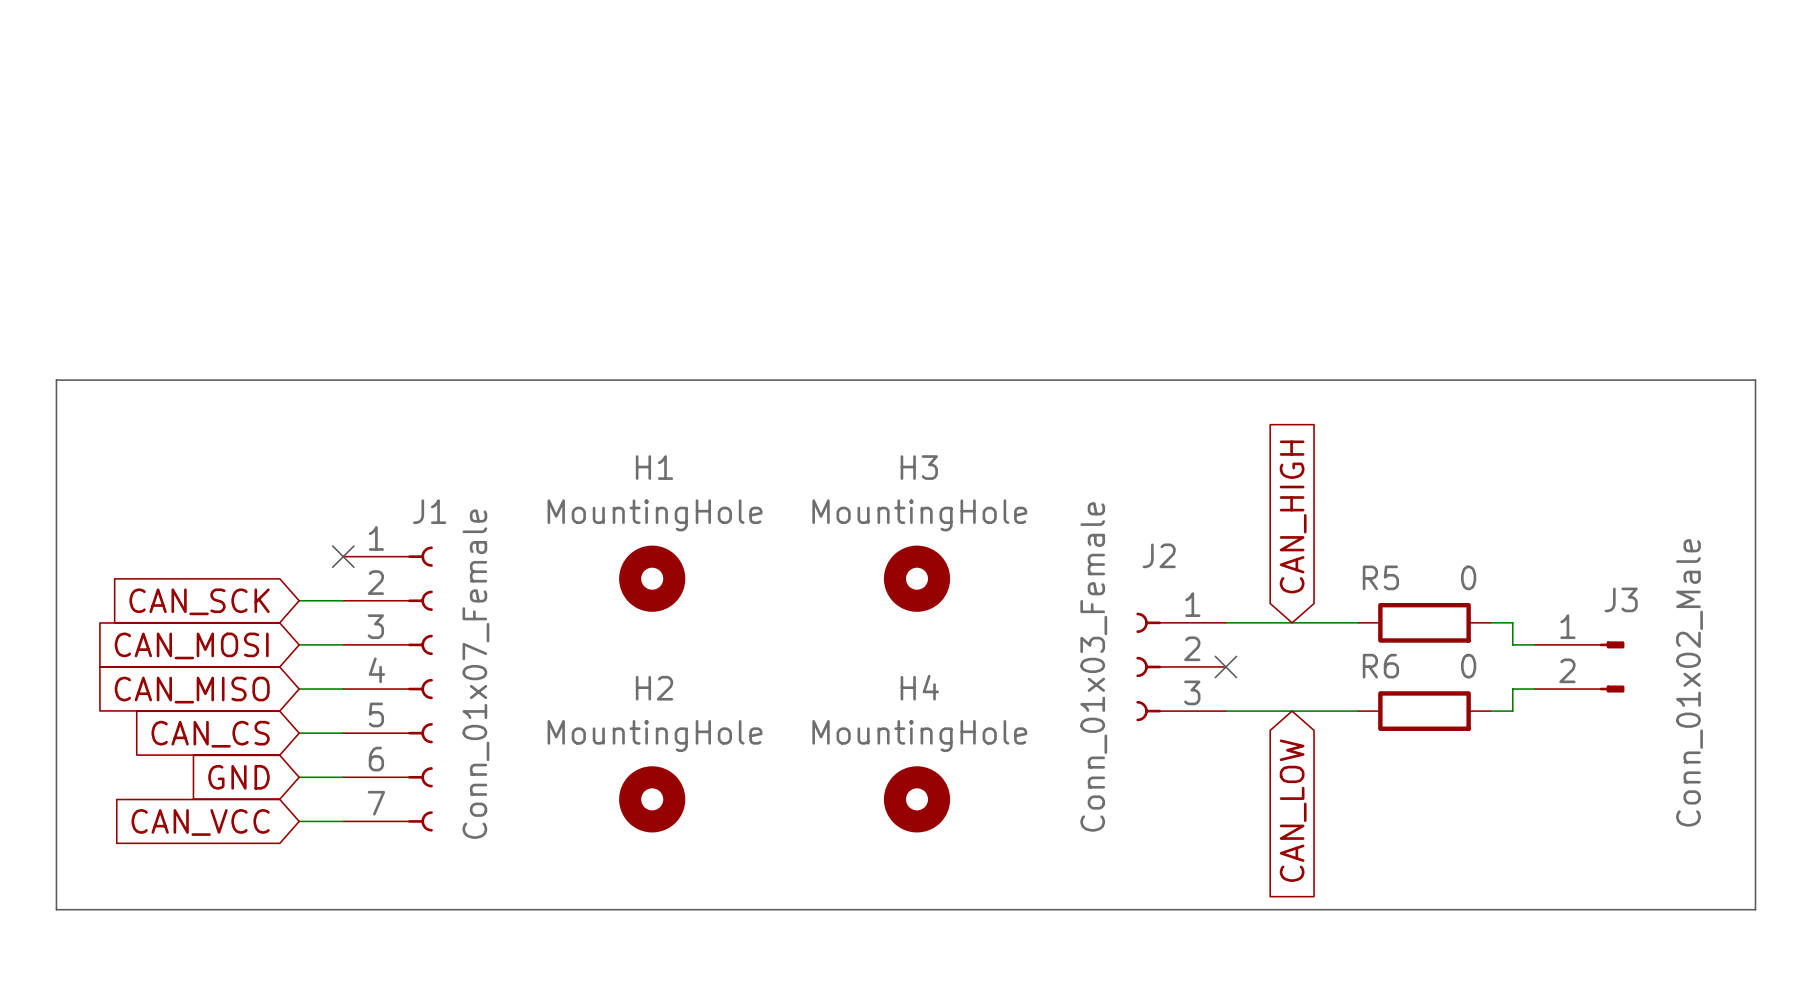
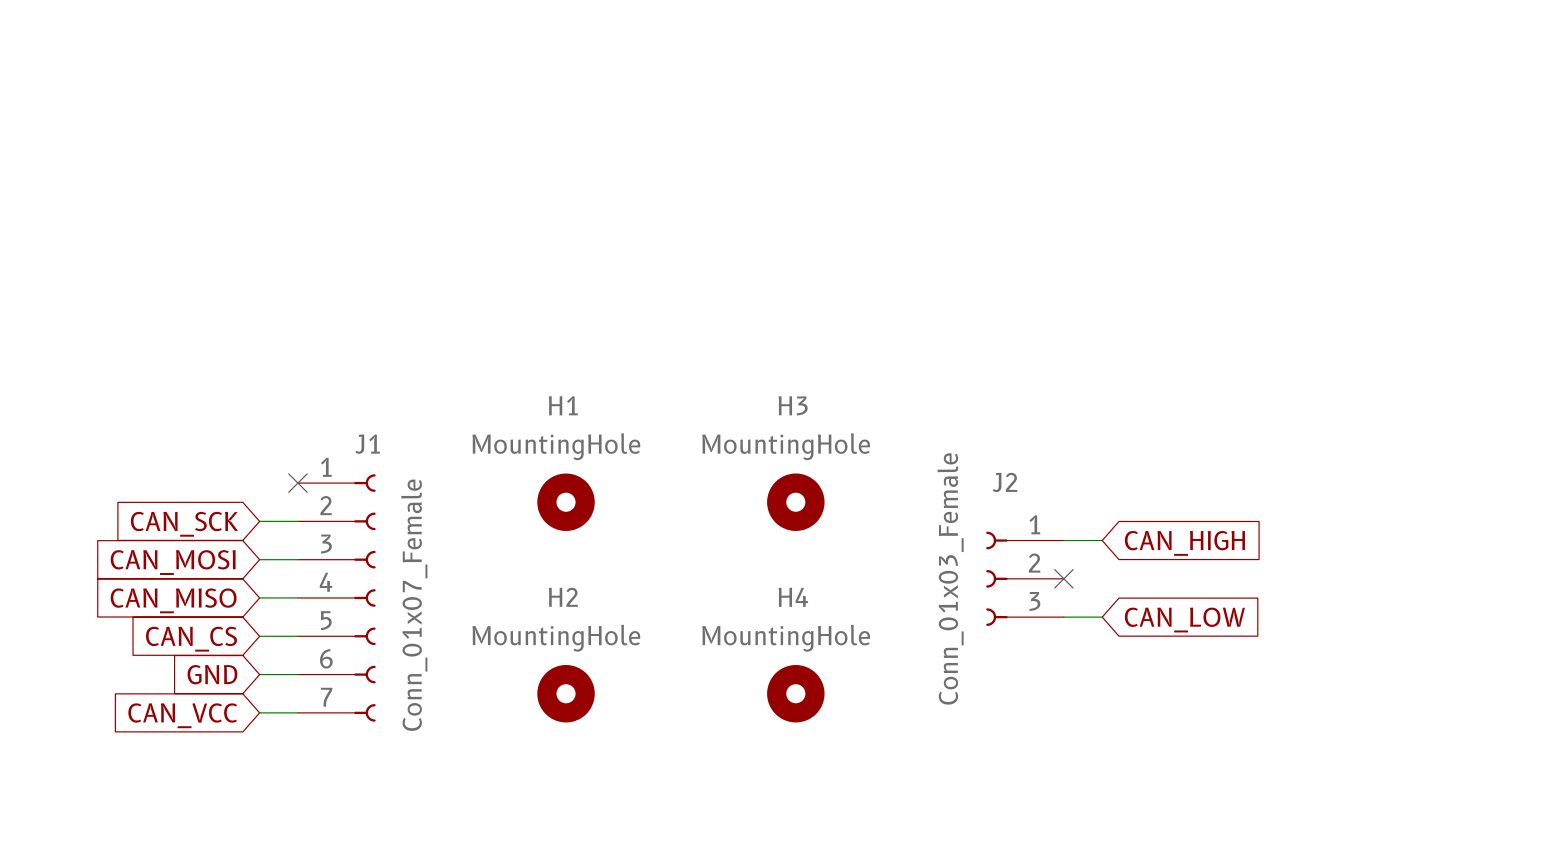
line: (56, 380) (1755, 380) (1755, 909) (56, 909) (56, 380) -> none
global label rotation: 0° (1293, 516) -> 90° clockwise (1184, 543)
wire: (1270, 622) (1358, 622) -> none
R5: 0 (1424, 622) -> none
wire: (1490, 622) (1512, 622) (1512, 644) (1534, 644) -> none
J3: Conn_01x02_Male (1579, 666) -> none
wire: (1534, 689) (1512, 689) (1512, 711) (1490, 711) -> none
wire: (1270, 711) (1358, 711) -> none
R6: 0 (1424, 711) -> none
global label rotation: 0° (1293, 810) -> 90° counterclockwise (1184, 619)

